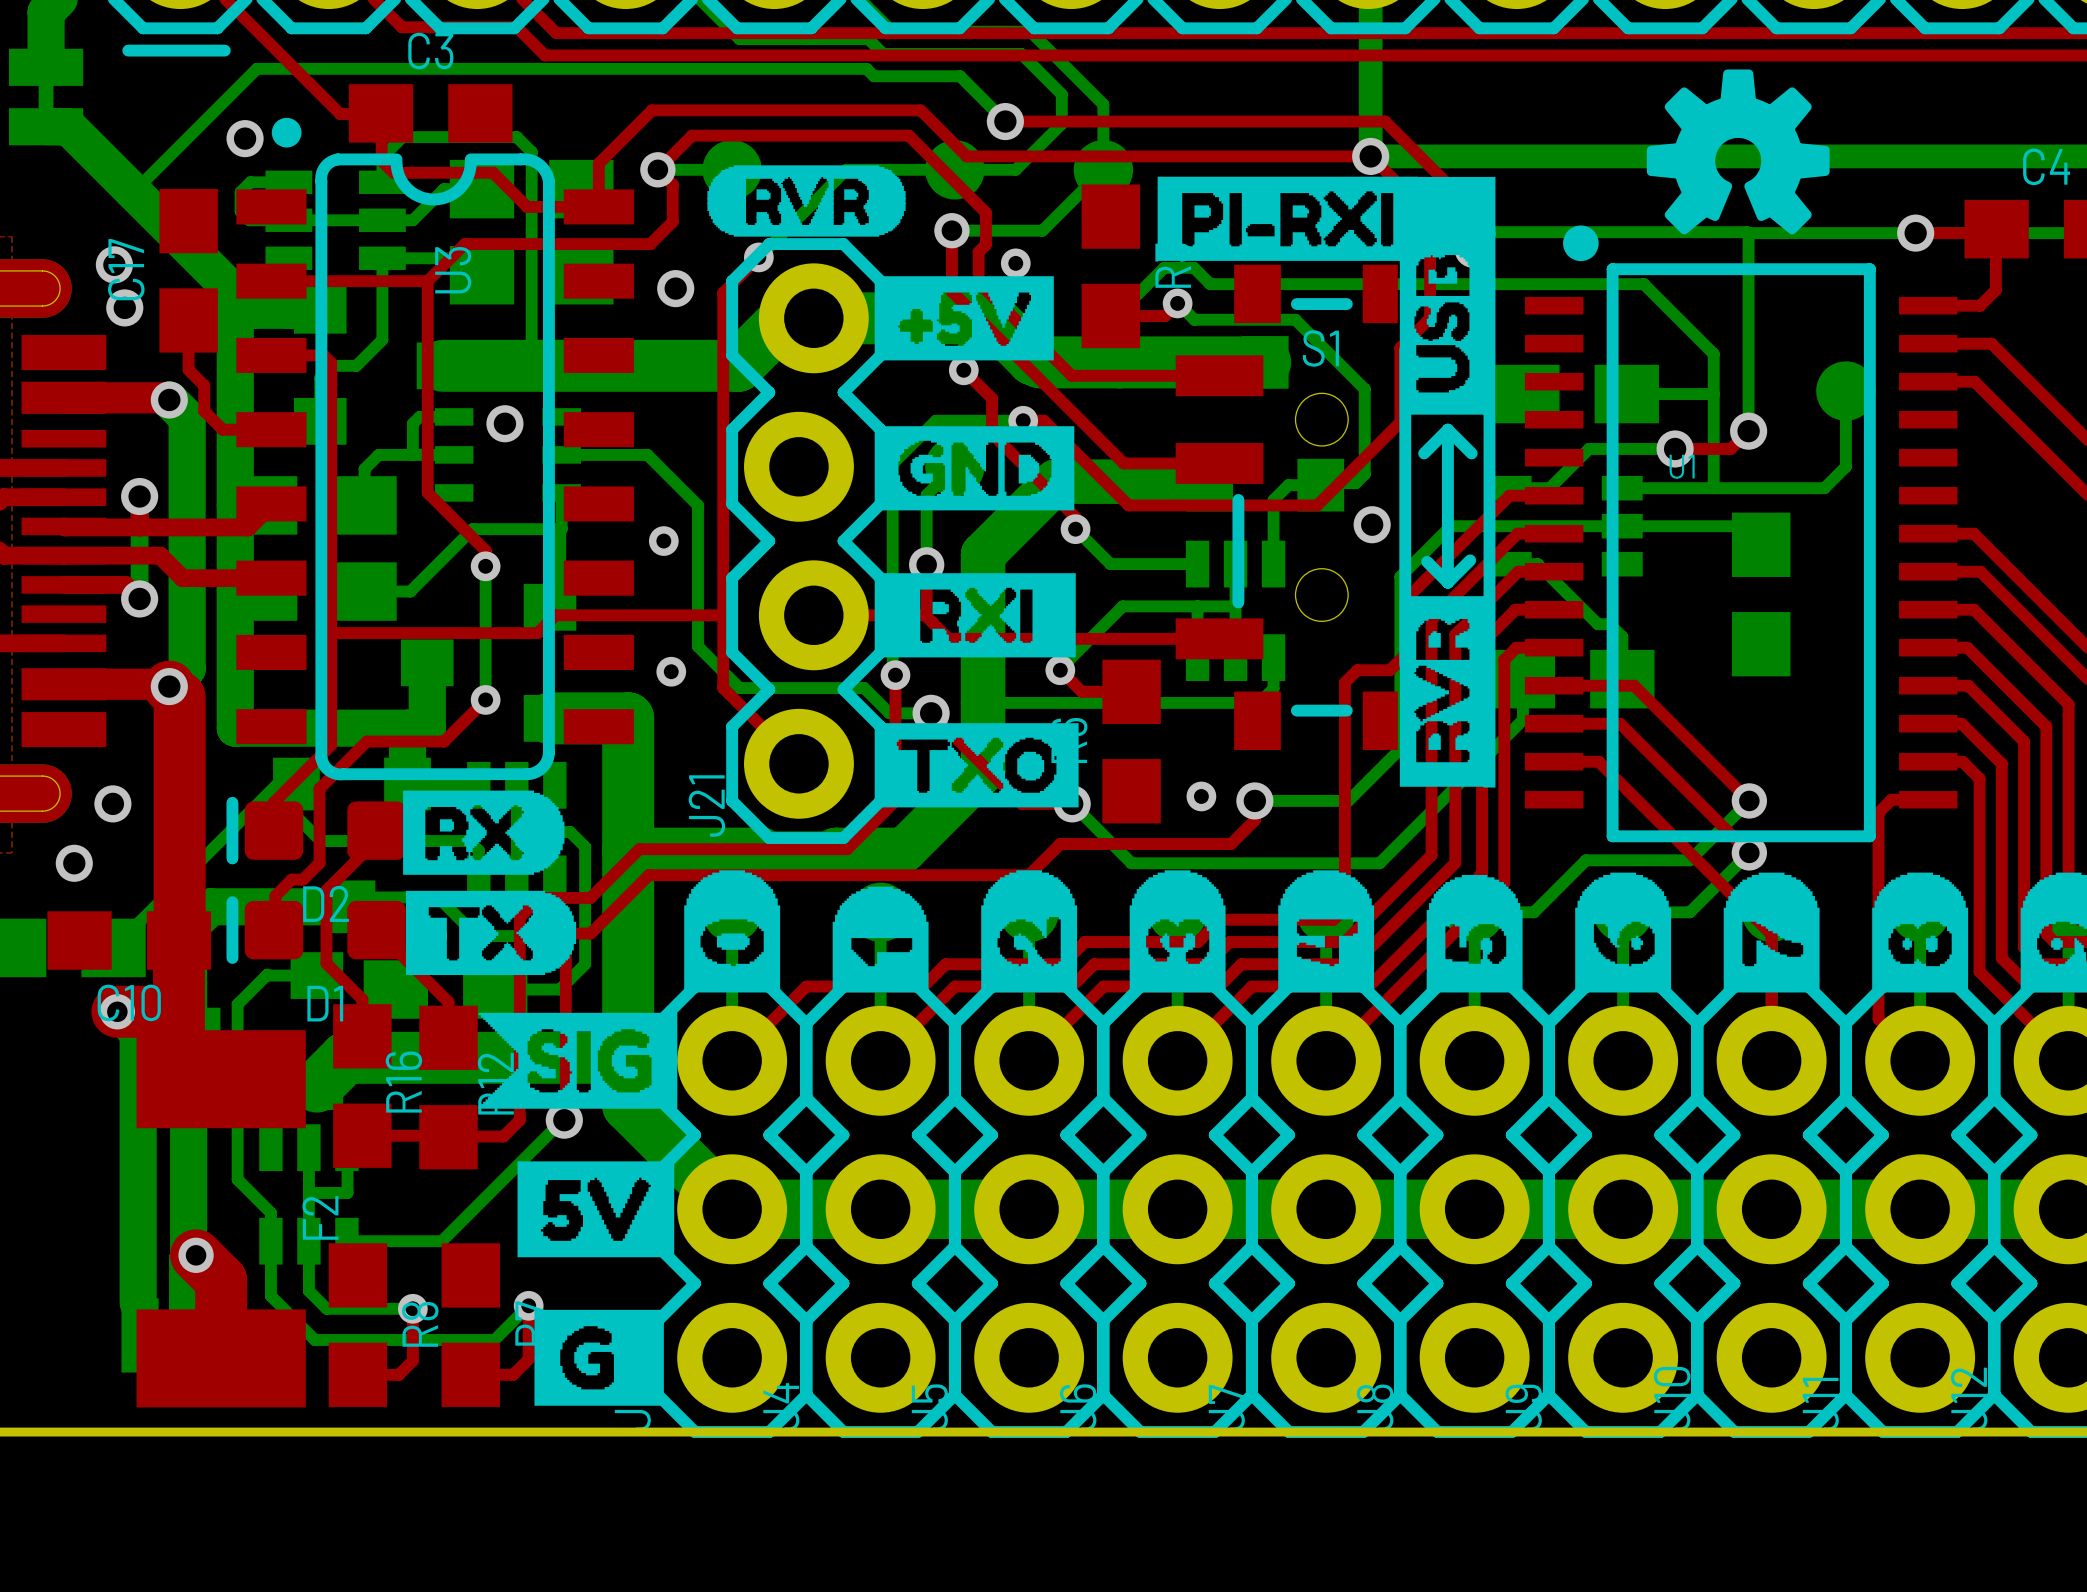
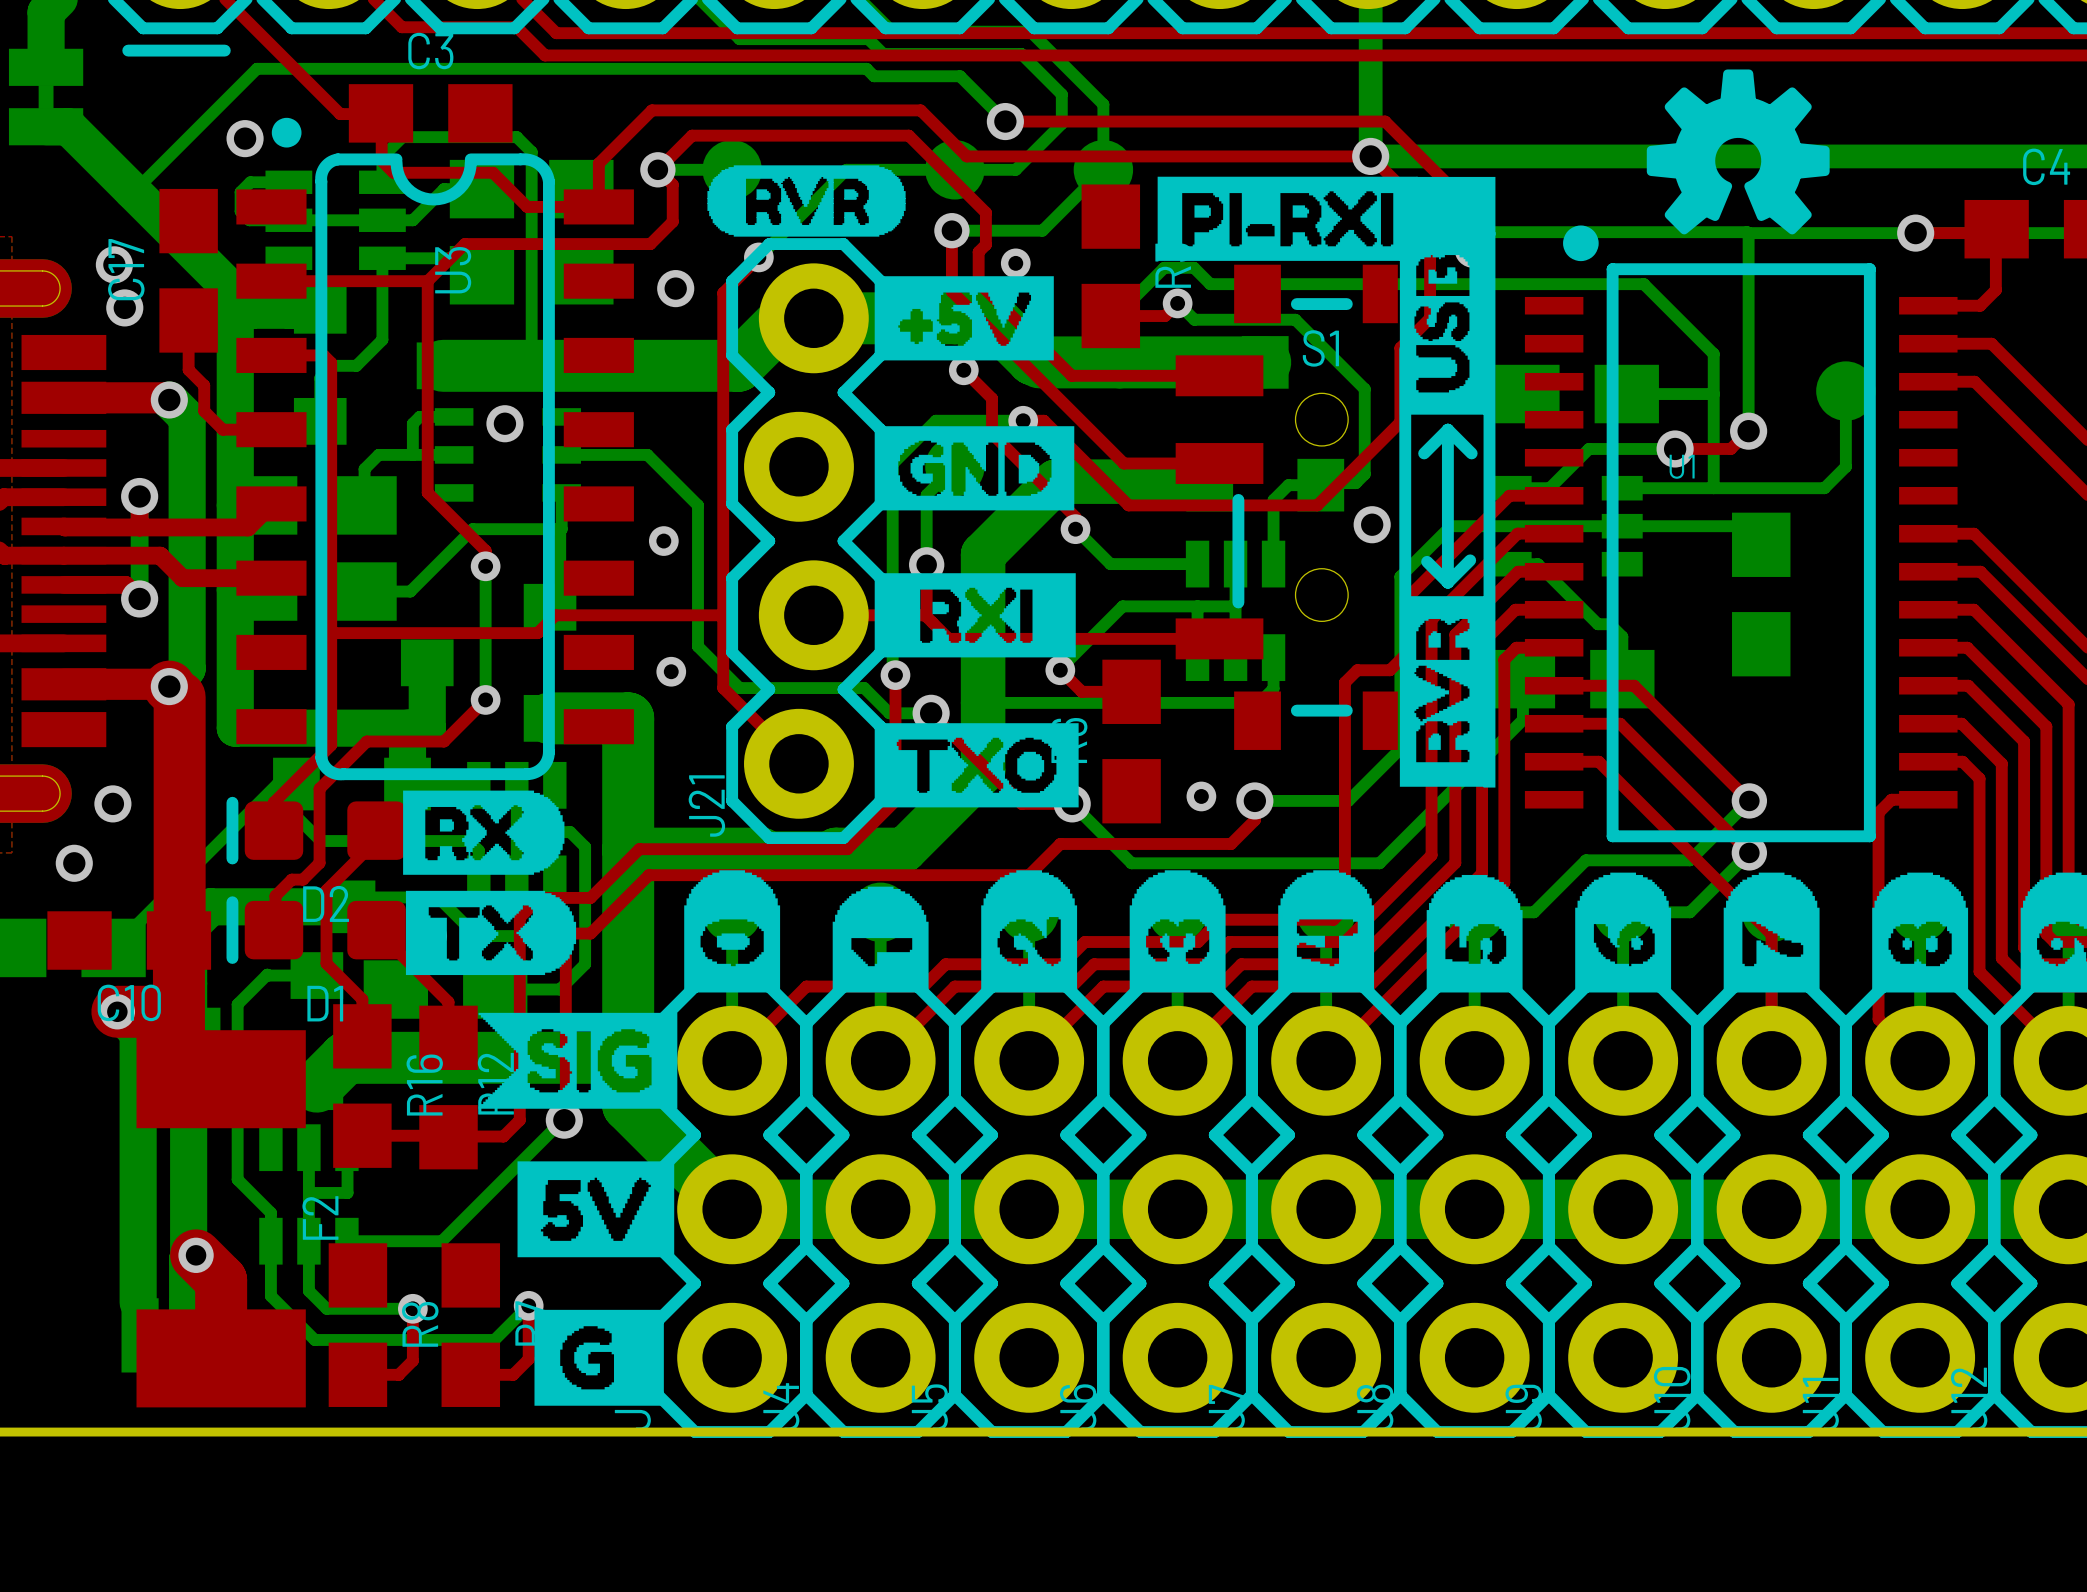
R16 name position: R16 (403, 1082) -> R16 (424, 1085)

